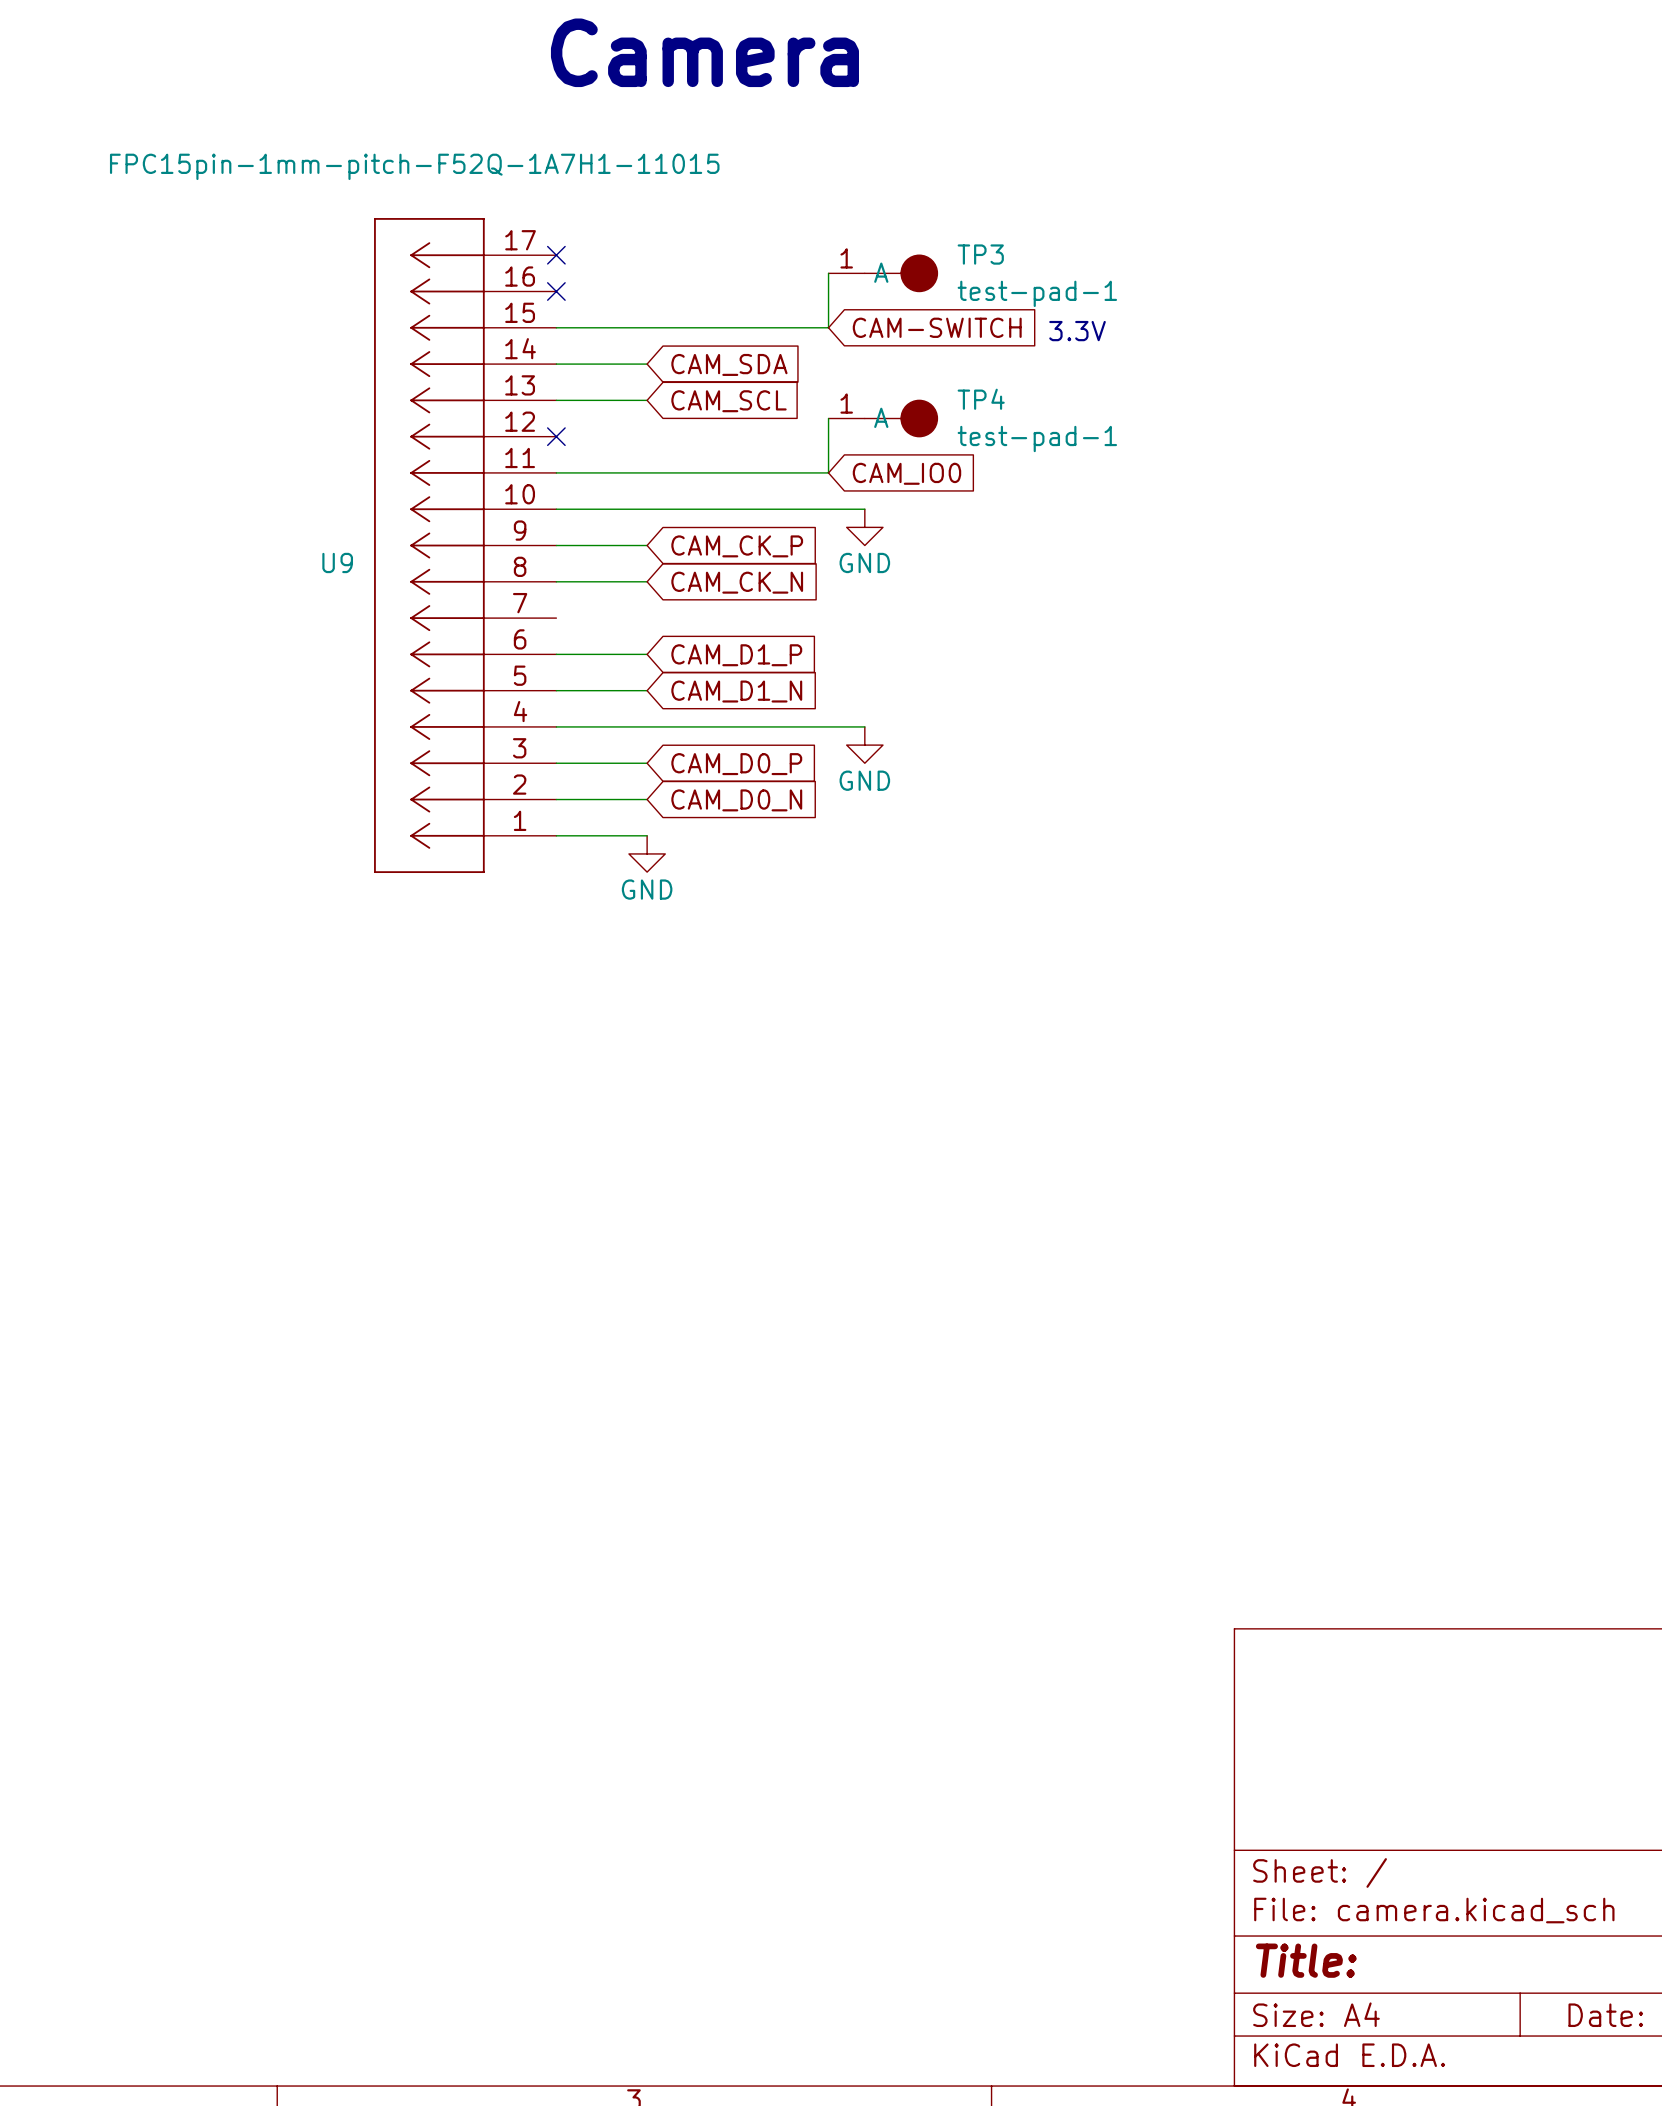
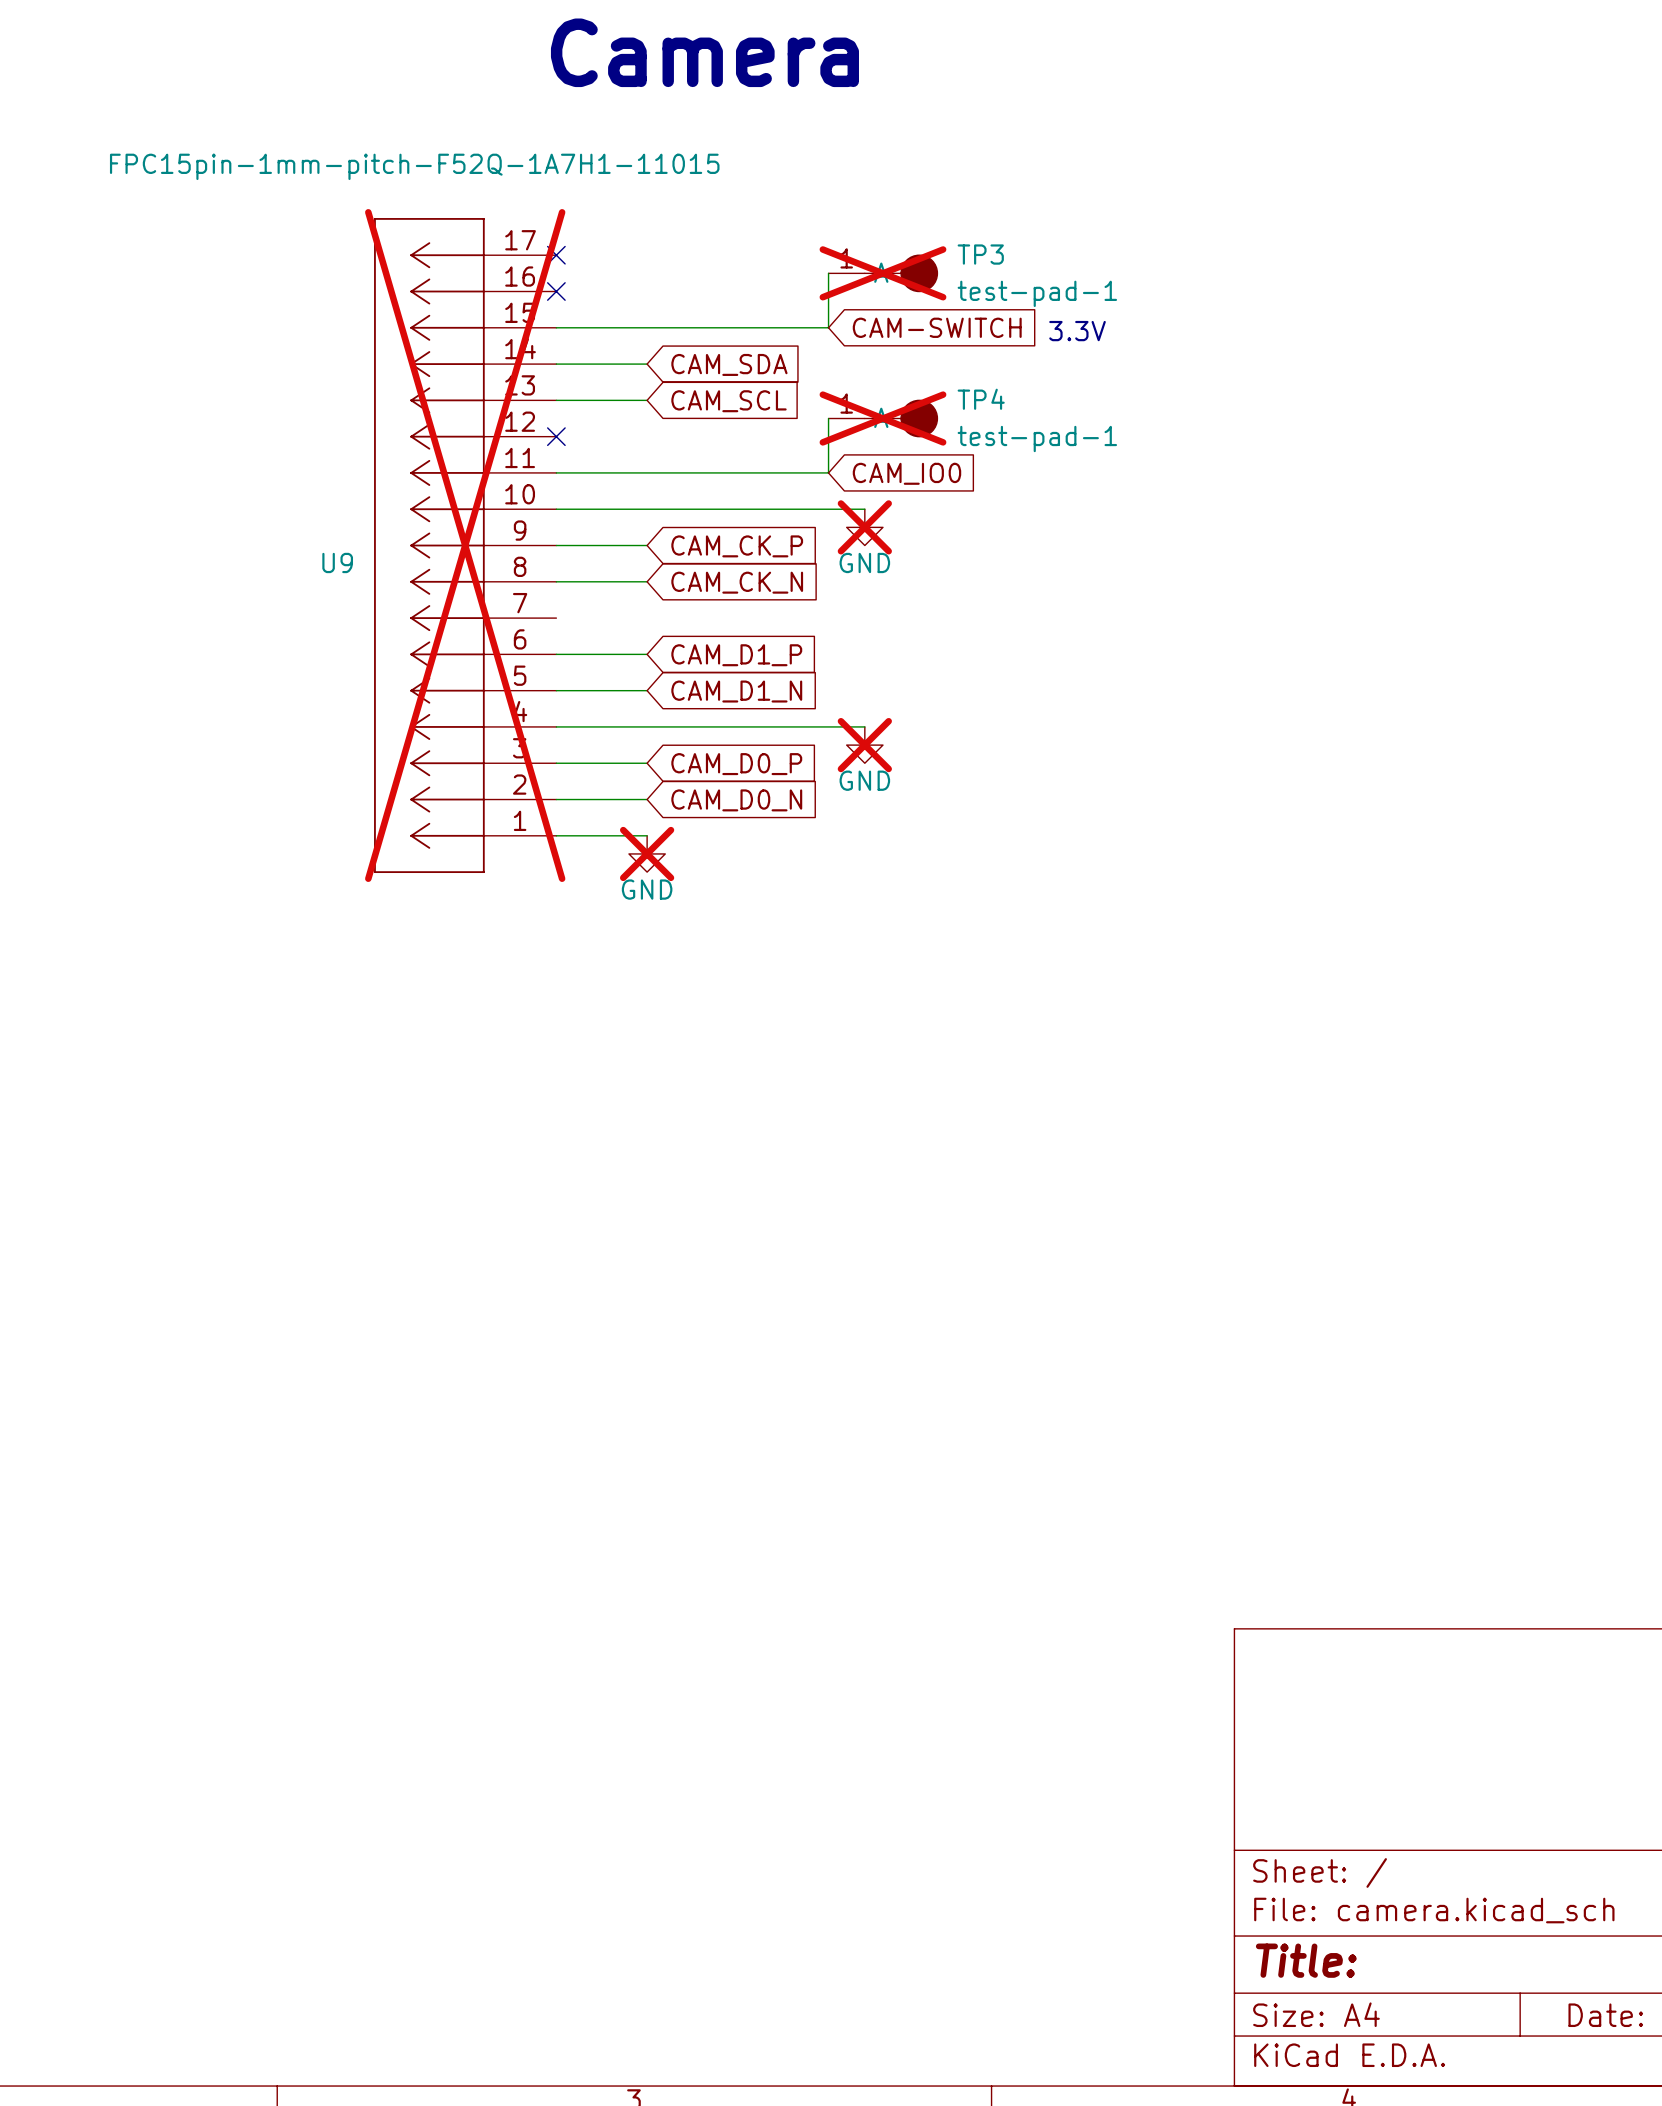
TP3 do-not-place cross: none -> (882, 273)
TP4 do-not-place cross: none -> (882, 418)
power symbol do-not-place cross: none -> (864, 527)
U9 do-not-place cross: none -> (465, 545)
power symbol do-not-place cross: none -> (864, 745)
power symbol do-not-place cross: none -> (647, 853)

